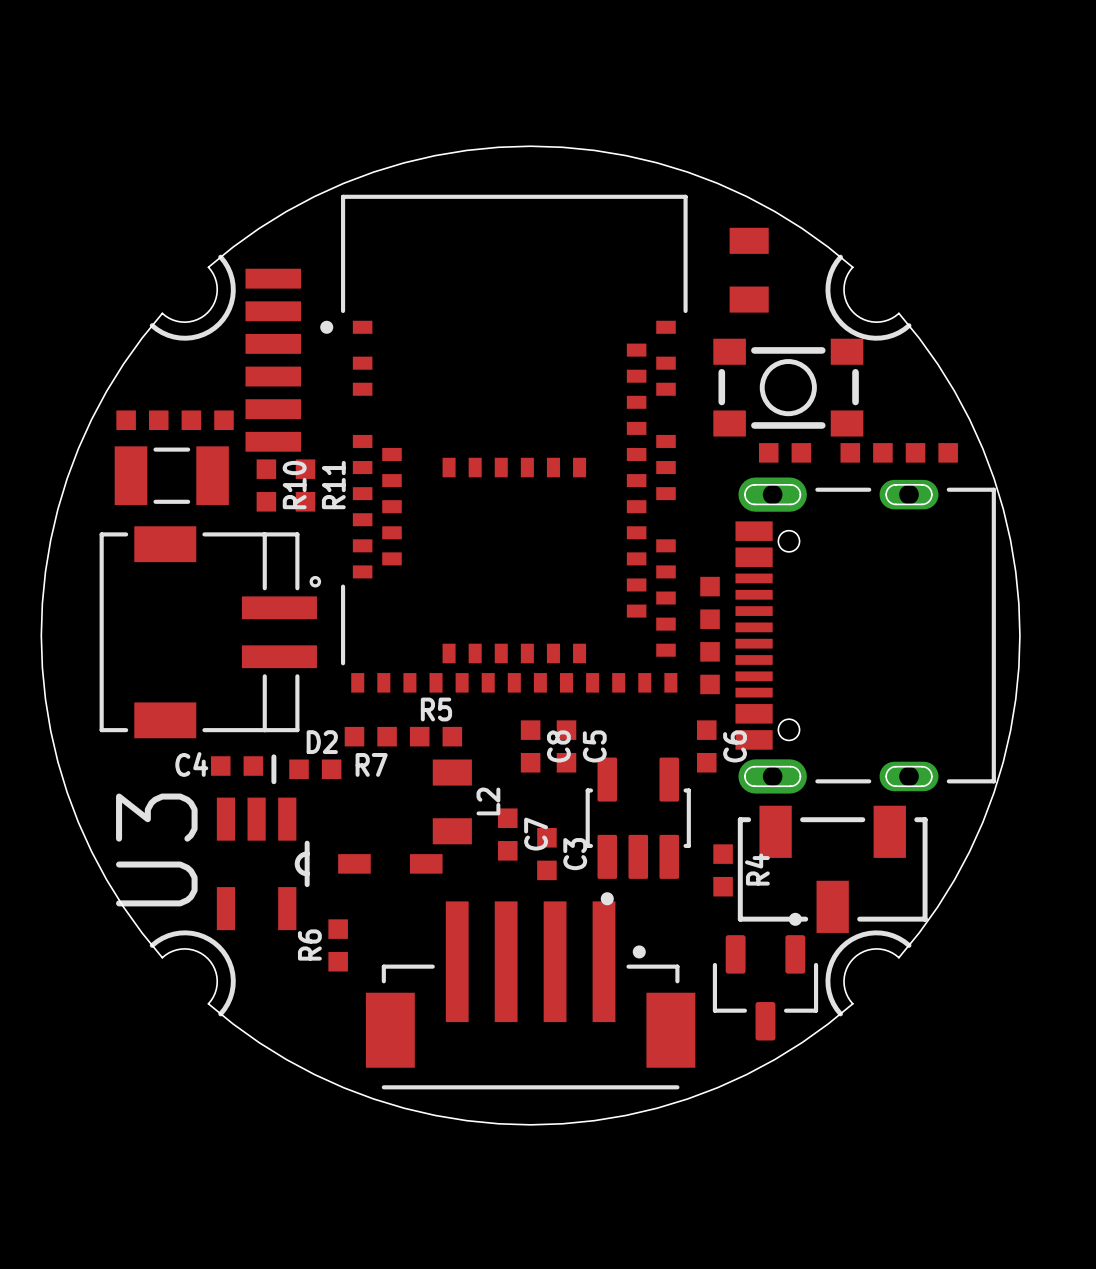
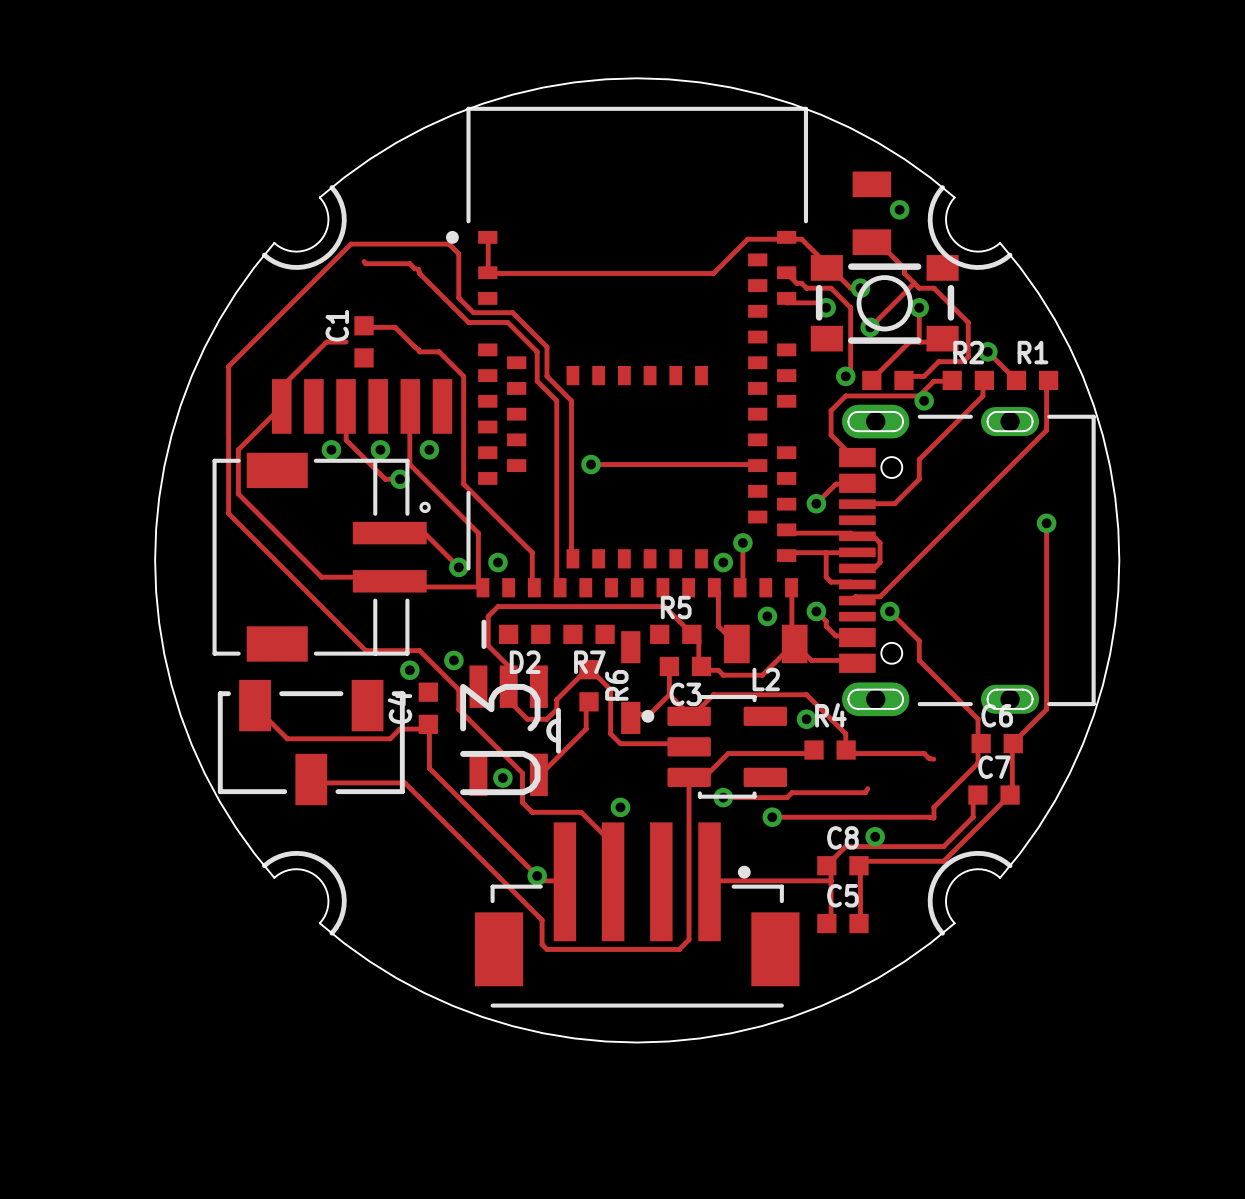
part position: (749, 270) -> (871, 213)
via: none -> (899, 209)
track: none -> (487, 237) (488, 273) (713, 273) (747, 239) (782, 239) (786, 237) (786, 239) (801, 239) (826, 263) (826, 267) (831, 268) (850, 288) (860, 288)
track: none -> (871, 242) (875, 239) (904, 268) (904, 273) (919, 288) (933, 288) (968, 322) (968, 356) (963, 361) (938, 361) (924, 376) (904, 377)
track: none -> (364, 261) (365, 263) (409, 263) (418, 269) (419, 273) (468, 322) (507, 322) (537, 351) (537, 381) (556, 400) (556, 586) (560, 587)
track: none -> (786, 272) (796, 283) (801, 283) (806, 288) (831, 288) (850, 307) (850, 371) (845, 376)
track: none -> (914, 283) (870, 327)
via: none -> (860, 288)
part rotation: 0° (273, 360) -> 90° clockwise (362, 406)
part position: (273, 360) -> (362, 406)
track: none -> (786, 298) (786, 302) (821, 302) (826, 307)
via: none -> (826, 307)
track: none -> (919, 307) (919, 342)
via: none -> (919, 307)
part position: (788, 387) -> (884, 303)
track: none -> (364, 325) (365, 327) (395, 327) (419, 351) (439, 351) (463, 376) (463, 484) (532, 552) (532, 586) (534, 587)
via: none -> (870, 327)
track: none -> (942, 338) (938, 342) (909, 342) (875, 376) (871, 377)
track: none -> (346, 342) (326, 342) (282, 386) (282, 405) (238, 449) (238, 493) (321, 577) (385, 577) (395, 586) (478, 586) (478, 533) (409, 464) (410, 406)
C1: none -> (364, 341)
part: (142, 420) -> none
part: (207, 420) -> none
track: none -> (987, 351) (1016, 380)
via: none -> (987, 351)
R2 name: none -> R2 (968, 352)
R1 name: none -> R1 (1032, 352)
part position: (503, 443) -> (627, 352)
via: none -> (845, 376)
track: none -> (952, 380) (933, 381) (919, 395)
track: none -> (984, 380) (982, 395) (919, 459) (919, 479) (894, 503) (854, 504)
track: none -> (1048, 380) (1046, 381) (1046, 430) (880, 596) (855, 596) (854, 600)
track: none -> (919, 395) (845, 395) (831, 410) (831, 435) (854, 457)
via: none -> (924, 400)
part: (171, 475) -> none
track: none -> (346, 406) (346, 440) (385, 479) (400, 479)
R10: (266, 485) -> none
R11: (305, 485) -> none
via: none -> (331, 449)
via: none -> (380, 449)
via: none -> (429, 449)
track: none -> (591, 464) (757, 465)
via: none -> (591, 464)
via: none -> (400, 479)
track: none -> (854, 483) (835, 484) (816, 503)
via: none -> (816, 503)
track: none -> (1046, 523) (1046, 709) (1012, 743) (1012, 792) (943, 861) (860, 861) (859, 923)
via: none -> (1046, 523)
part: (710, 602) -> none
track: none -> (786, 529) (786, 533) (850, 533) (855, 538) (875, 538) (880, 542) (880, 562) (875, 567) (854, 568)
track: none -> (390, 533) (424, 533) (458, 567)
track: none -> (742, 542) (742, 586) (740, 587)
via: none -> (742, 542)
track: none -> (826, 552) (826, 577) (831, 582) (850, 582) (854, 584)
track: none -> (854, 552) (786, 552) (786, 555)
track: none -> (572, 558) (571, 400) (546, 376) (546, 346) (512, 312) (473, 312) (458, 297) (458, 253) (449, 244) (351, 244) (228, 366) (228, 513) (365, 650) (419, 650) (458, 689) (458, 709) (522, 773) (522, 802) (532, 812) (581, 812) (610, 841) (610, 880) (613, 881)
via: none -> (497, 562)
via: none -> (723, 562)
via: none -> (458, 567)
track: none -> (714, 587) (718, 591) (718, 626) (736, 643)
track: none -> (791, 587) (791, 640) (794, 643)
part: (710, 668) -> none
track: none -> (816, 611) (826, 621) (826, 626) (835, 635) (854, 637)
via: none -> (816, 611)
track: none -> (889, 611) (919, 640) (919, 660) (978, 719) (978, 738) (981, 743) (978, 743) (978, 763) (933, 807) (933, 818) (772, 817)
via: none -> (889, 611)
via: none -> (767, 616)
track: none -> (794, 643) (762, 675) (723, 675) (718, 670) (703, 670) (698, 665) (698, 640) (664, 606) (497, 606) (488, 616) (488, 645) (507, 665) (507, 684) (512, 689) (512, 704) (527, 719) (546, 719) (556, 709) (556, 699) (586, 670) (589, 669) (610, 689) (610, 733) (620, 743) (689, 743) (689, 746)
track: none -> (794, 643) (811, 660) (850, 660) (854, 663)
R7 position: (370, 736) -> (589, 634)
R5 position: (436, 736) -> (675, 634)
via: none -> (453, 660)
D2 name position: D2 (322, 742) -> D2 (525, 662)
track: none -> (669, 666) (669, 694)
C8 rotation: 0° (530, 746) -> 90° clockwise (842, 865)
C8 position: (530, 746) -> (842, 865)
C5 rotation: 0° (566, 746) -> 90° clockwise (842, 923)
C5 position: (566, 746) -> (842, 923)
C6 rotation: 0° (706, 746) -> 90° clockwise (997, 743)
C6 position: (706, 746) -> (997, 743)
via: none -> (409, 670)
C4 rotation: 0° (237, 766) -> 90° clockwise (428, 708)
C4 position: (237, 766) -> (428, 708)
D2 position: (306, 769) -> (515, 634)
track: none -> (669, 694) (689, 716) (693, 714) (713, 694) (806, 694) (845, 733) (845, 748) (850, 753) (924, 753) (929, 758) (933, 759)
track: none -> (669, 694) (649, 714) (635, 714) (630, 717)
track: none -> (589, 701) (586, 704) (586, 729) (538, 774)
track: none -> (255, 705) (287, 738) (390, 738) (400, 729) (424, 729) (428, 724) (429, 768) (542, 880) (564, 881)
via: none -> (806, 719)
L2 rotation: 0° (452, 801) -> 90° clockwise (765, 643)
L2 position: (452, 801) -> (765, 643)
track: none -> (814, 750) (811, 753) (728, 753) (708, 773) (693, 773) (689, 777) (689, 939) (679, 949) (546, 949) (542, 944) (542, 920) (404, 782) (311, 782) (311, 779)
part rotation: 0° (638, 831) -> 90° clockwise (714, 746)
C7 rotation: 0° (507, 834) -> 90° clockwise (993, 795)
C7 position: (507, 834) -> (993, 795)
U3 name position: U3 (156, 849) -> U3 (500, 739)
C3 rotation: 0° (546, 854) -> 90° clockwise (685, 666)
C3 position: (546, 854) -> (685, 666)
via: none -> (502, 778)
U3 position: (263, 863) -> (515, 730)
part rotation: 0° (390, 863) -> 90° clockwise (630, 682)
part position: (390, 863) -> (630, 682)
track: none -> (867, 788) (865, 792) (791, 792) (786, 797) (723, 797)
part position: (832, 869) -> (311, 742)
R4 rotation: 0° (723, 870) -> 90° clockwise (830, 750)
R4 position: (723, 870) -> (830, 750)
track: none -> (977, 795) (973, 797) (973, 817) (943, 846) (845, 846) (826, 865) (831, 866) (831, 920) (826, 923)
via: none -> (723, 797)
via: none -> (620, 807)
via: none -> (772, 817)
via: none -> (875, 836)
R6 name position: R6 (309, 945) -> R6 (616, 685)
R6 position: (338, 945) -> (589, 685)
via: none -> (537, 875)
track: none -> (831, 880) (709, 881)
part: (765, 976) -> none

